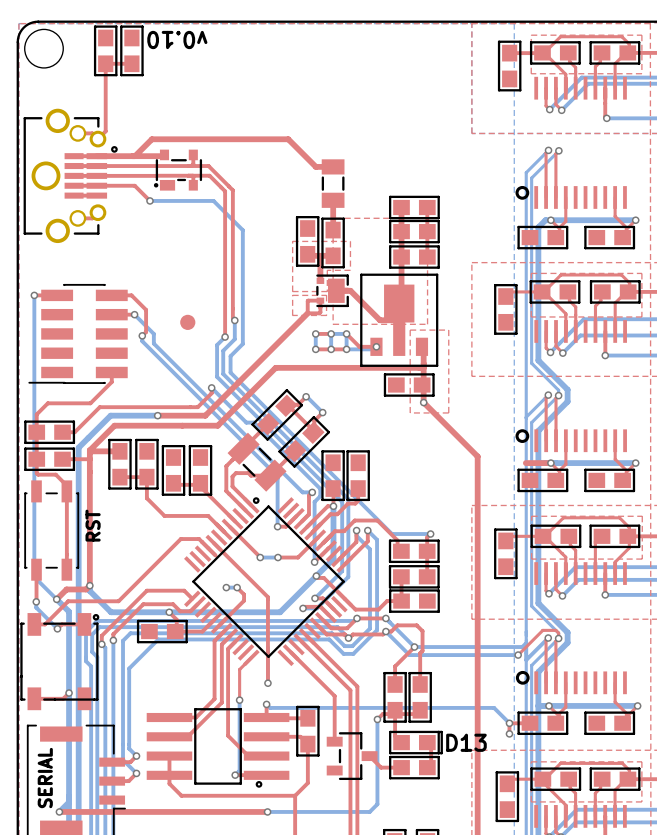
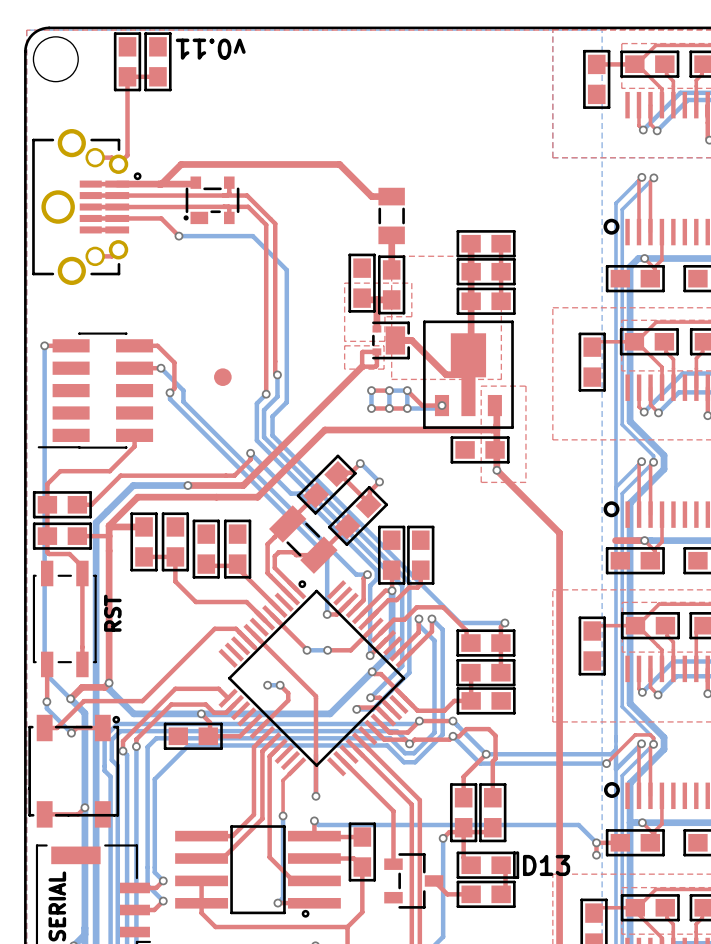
text: v0.10 (177, 39) -> v0.11 (210, 49)

